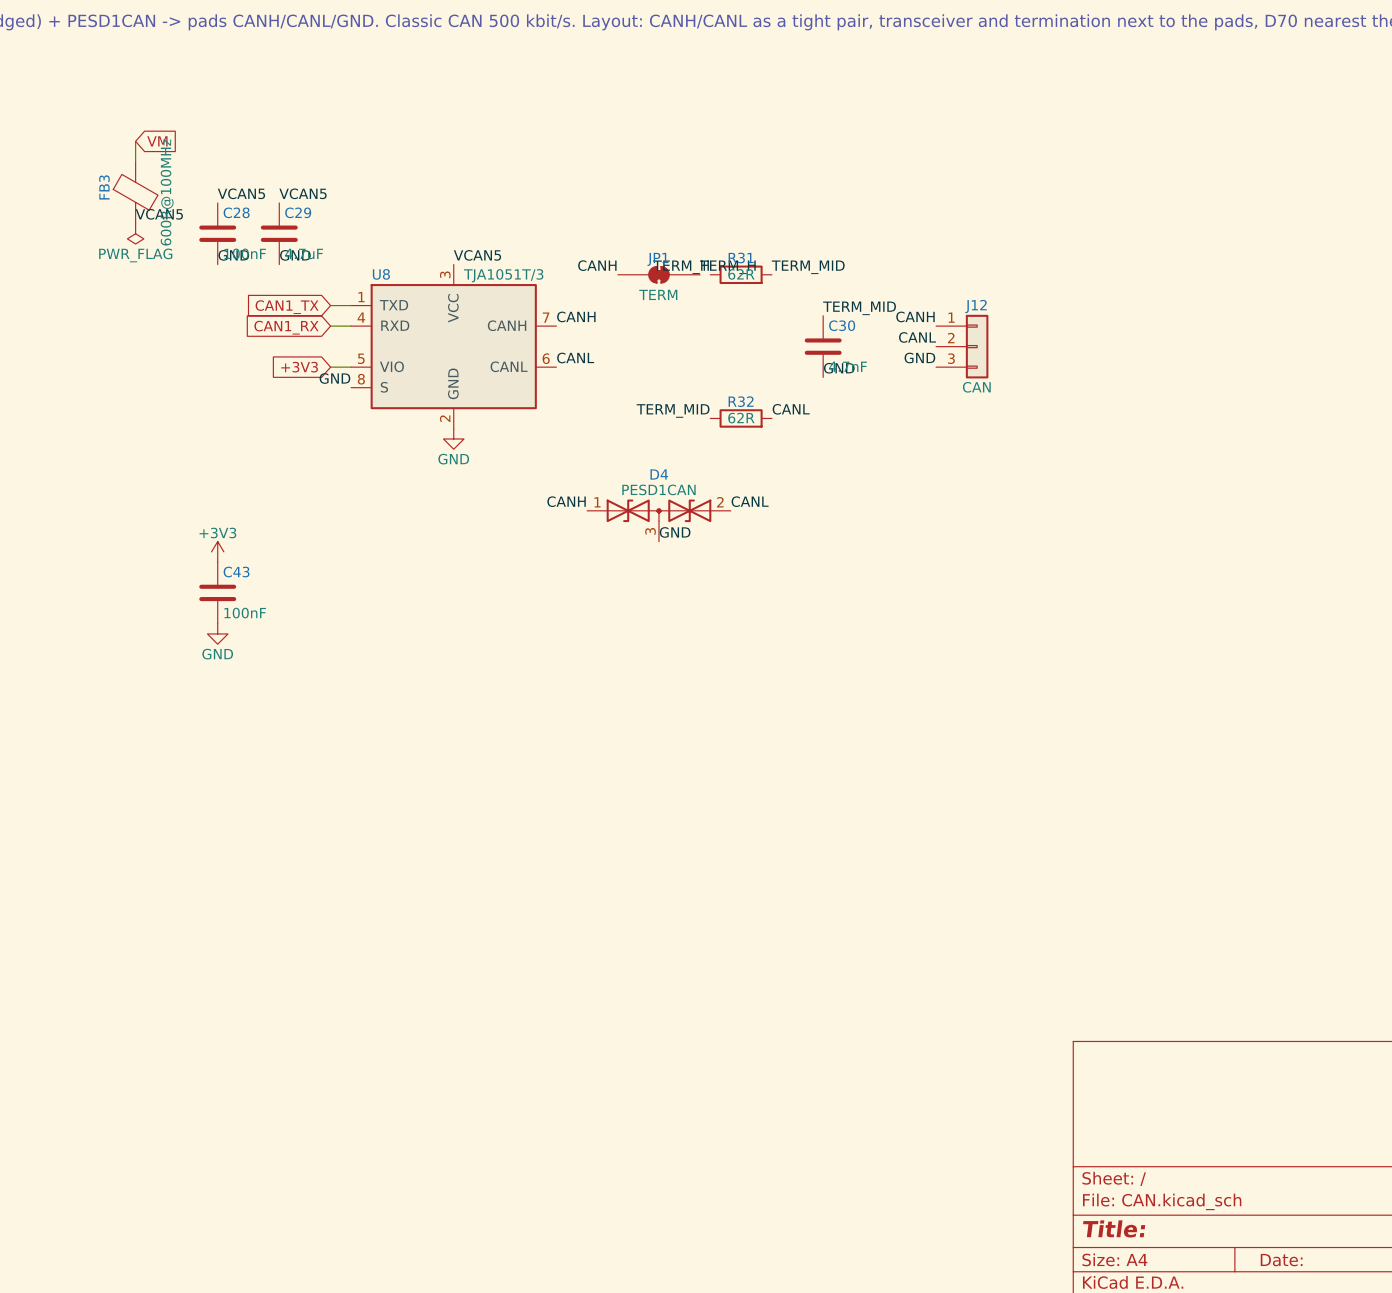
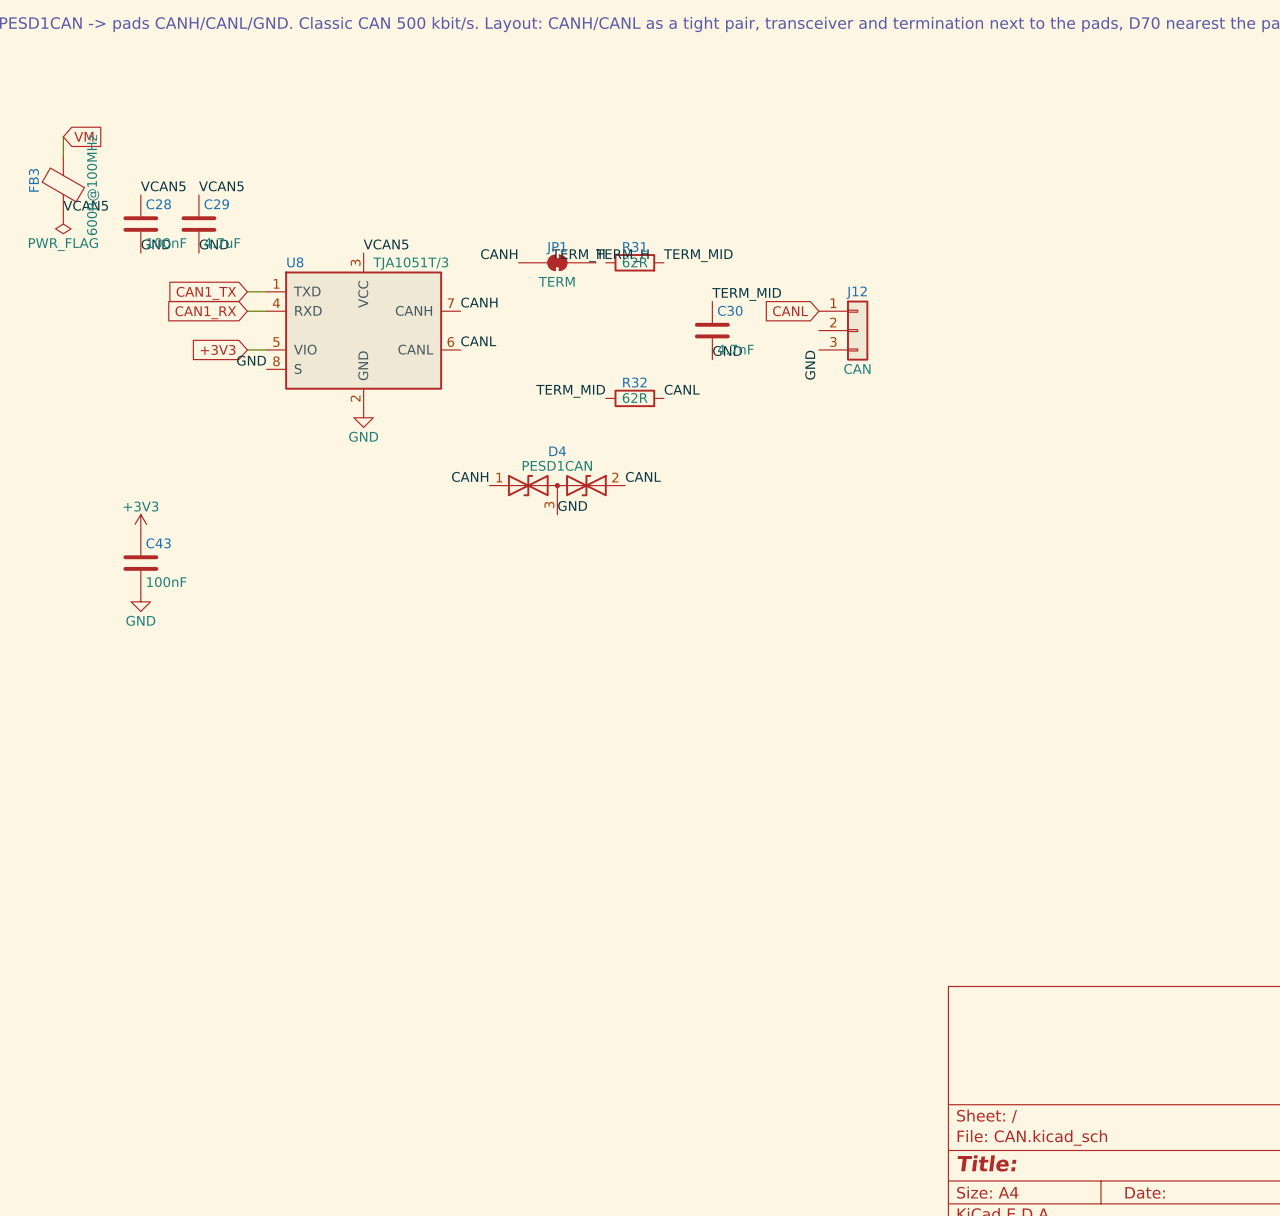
label: CANH (915, 316) -> none
global label: none -> CANL (790, 311)
label: CANL (917, 337) -> none
label rotation: 0° (919, 358) -> 90° counterclockwise (810, 365)

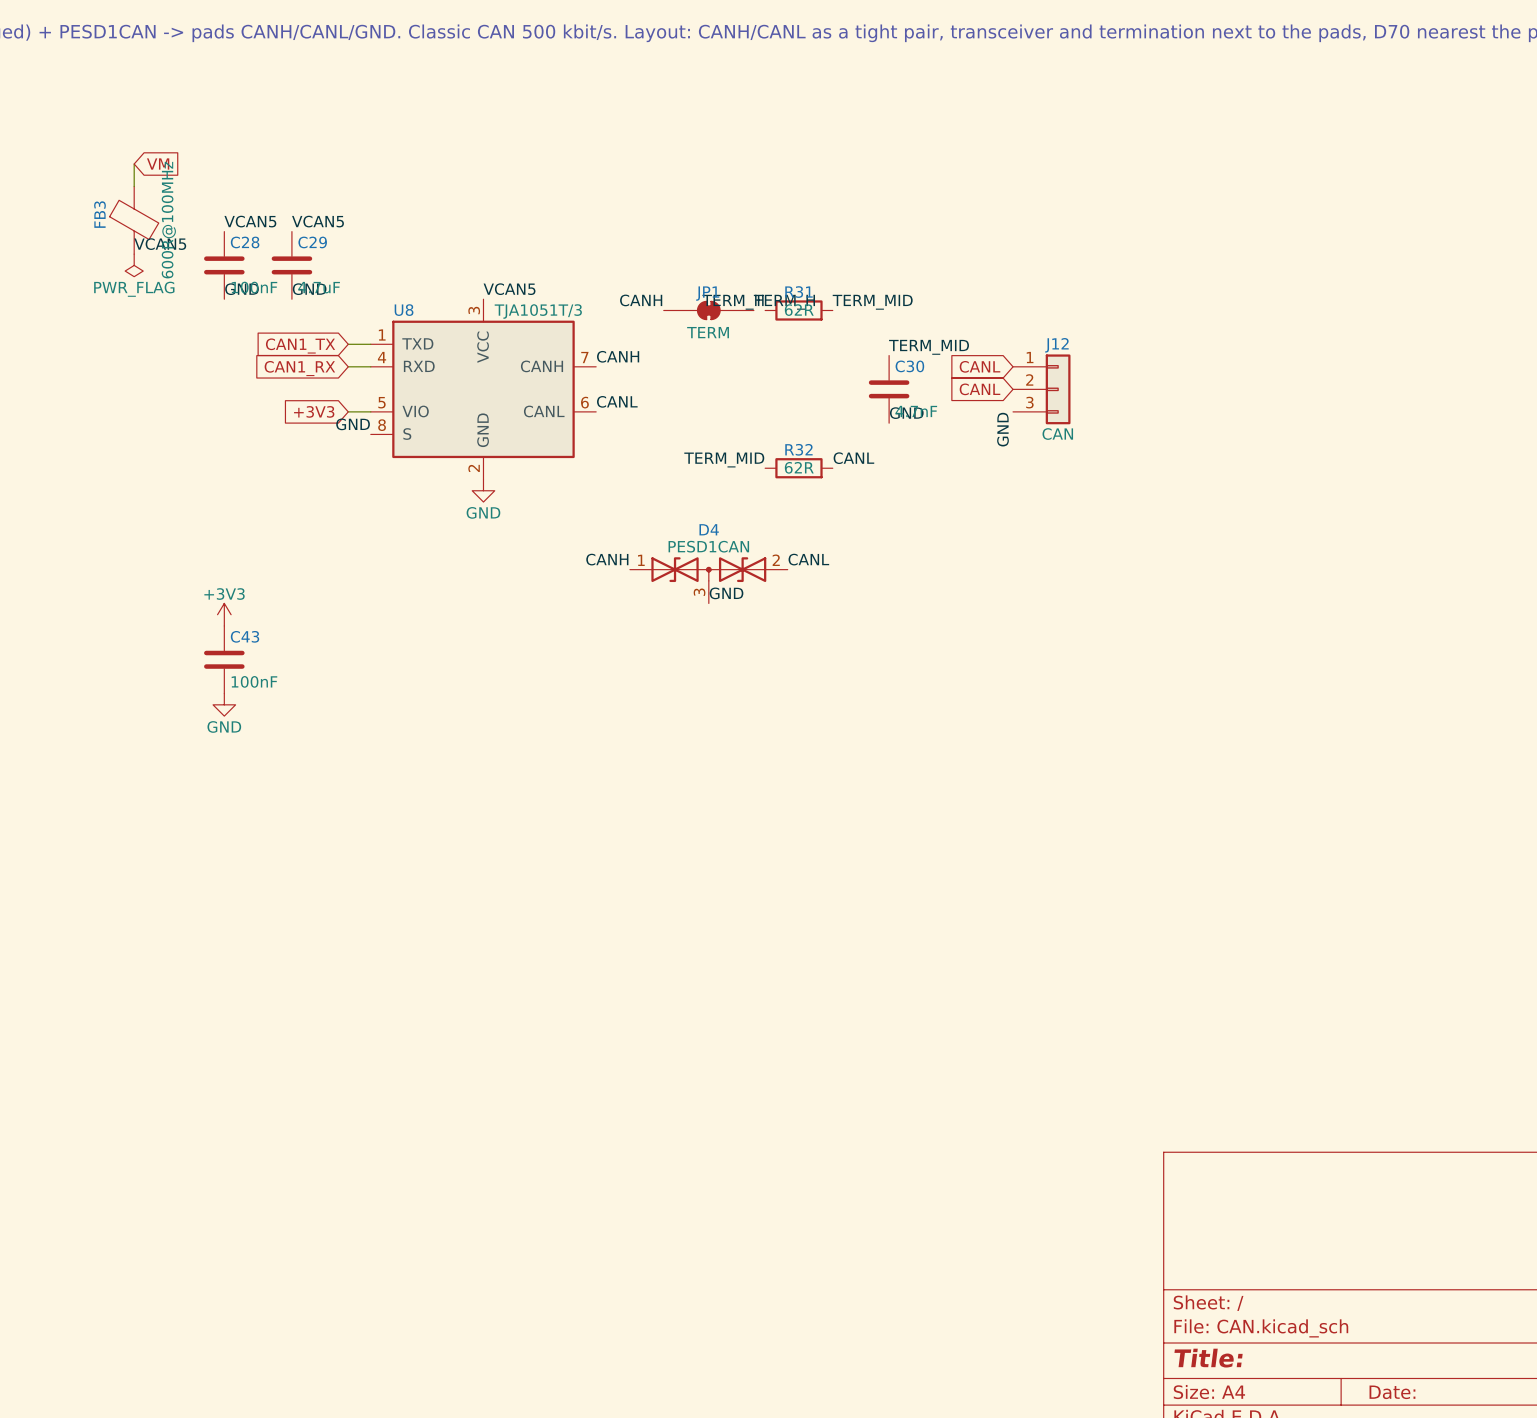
global label: none -> CANL (979, 389)

